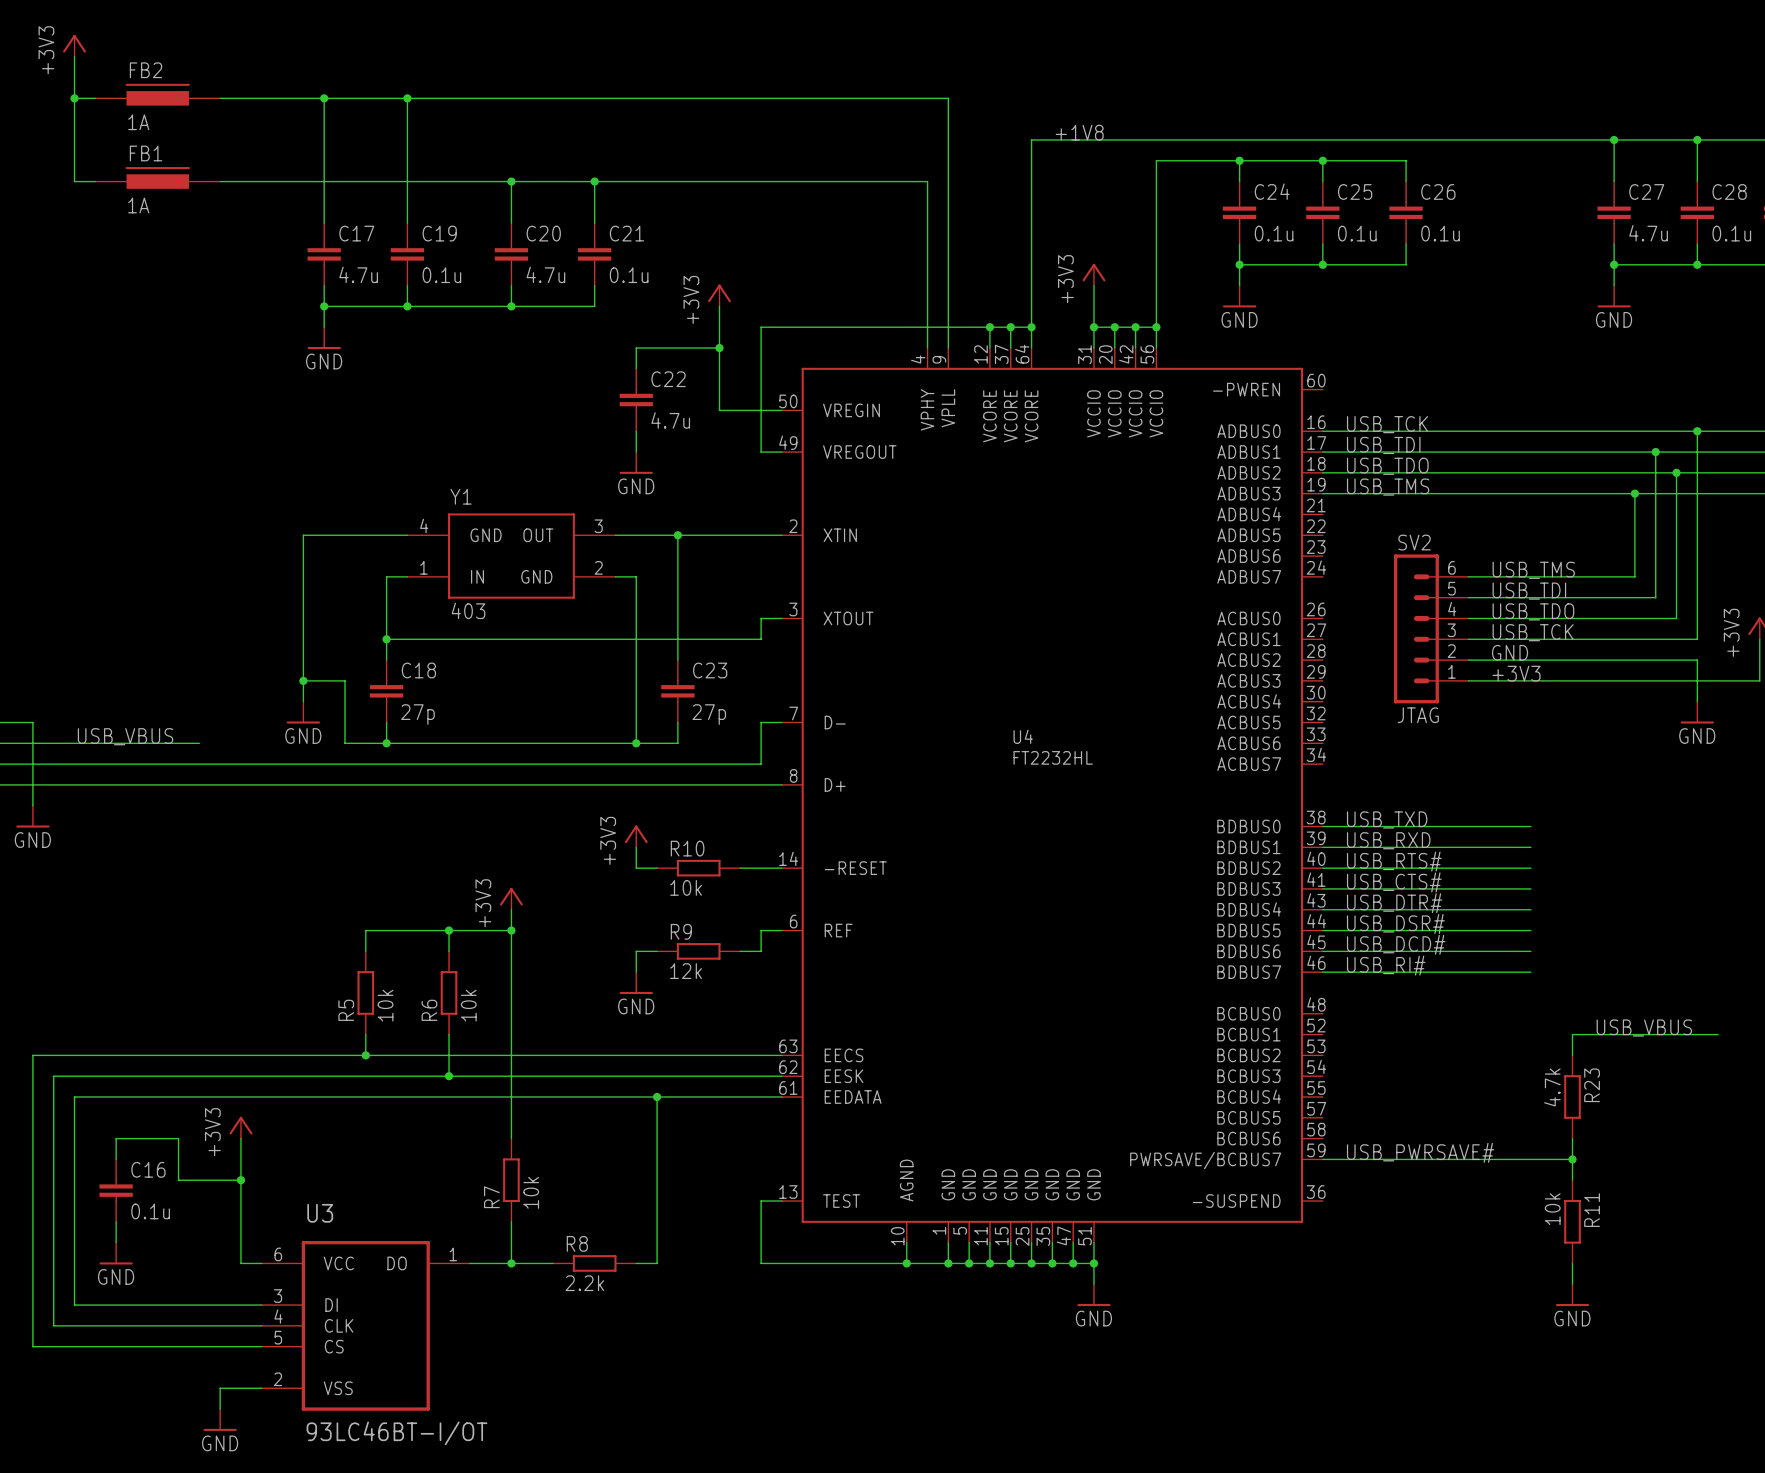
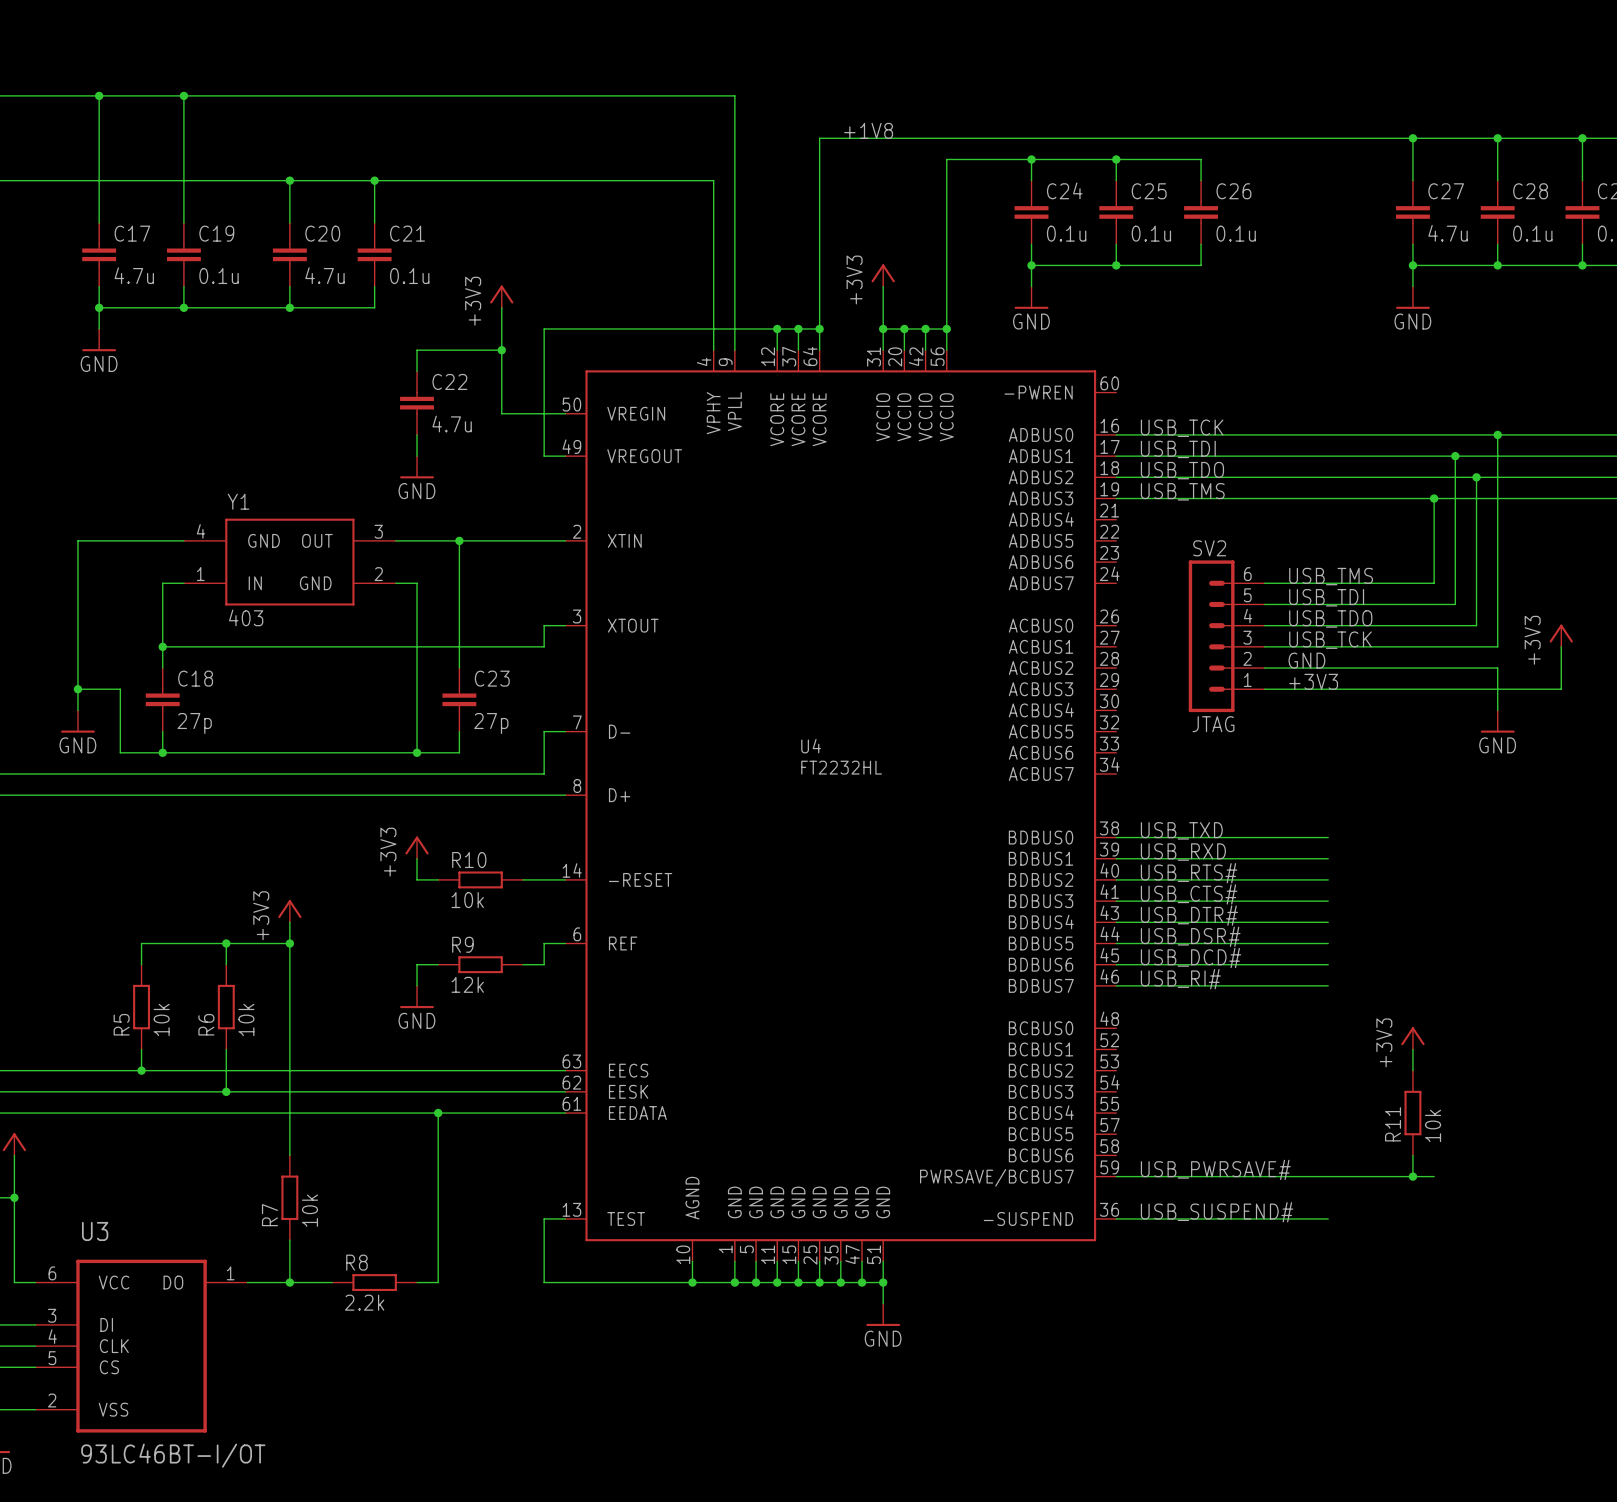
power symbol: none -> +3V3 (1412, 1038)
label: USB_VBUS (1644, 1028) -> none
wire: none -> (1412, 1049) (1412, 1070)
wire: (1718, 1034) (1572, 1034) (1572, 1055) -> none
R23: 4.7k (1572, 1097) -> none
wire: (1572, 1138) (1572, 1180) -> none
wire: none -> (1370, 1176) (1434, 1176)
junction position: (1572, 1159) -> (1412, 1176)
label: none -> USB_SUSPEND# (1217, 1212)
wire: none -> (1116, 1218) (1328, 1218)
R11 value position: 10k (1552, 1209) -> 10k (1433, 1125)
R11 name position: R11 (1592, 1210) -> R11 (1393, 1124)
R11 position: (1572, 1221) -> (1412, 1113)
wire: (1572, 1263) (1572, 1284) -> (1412, 1155) (1412, 1176)
power symbol: GND (1572, 1295) -> none

